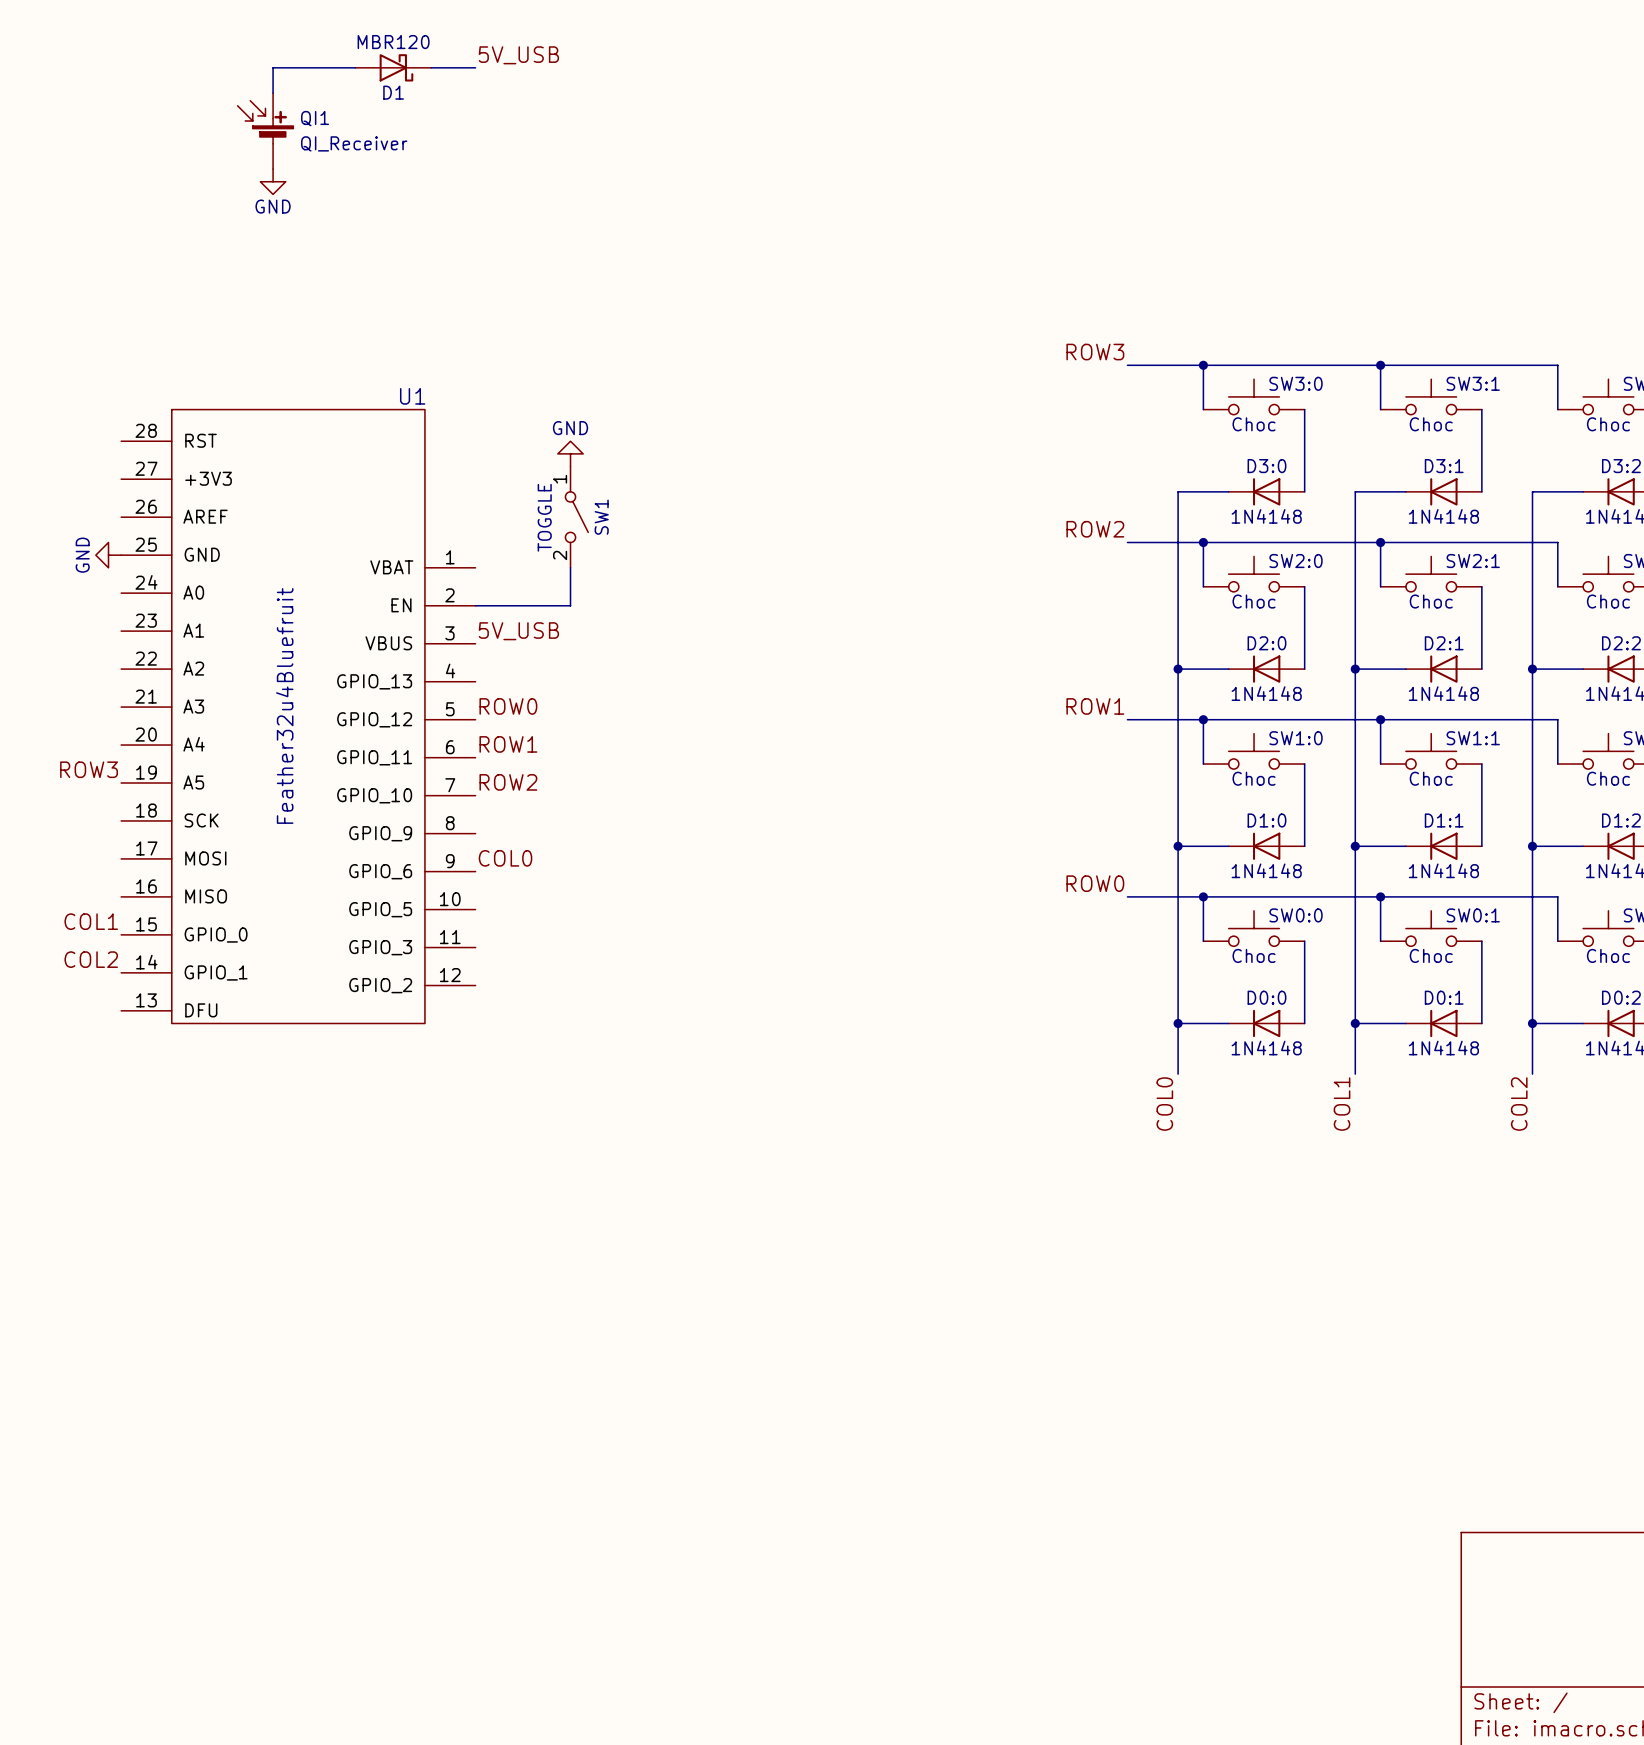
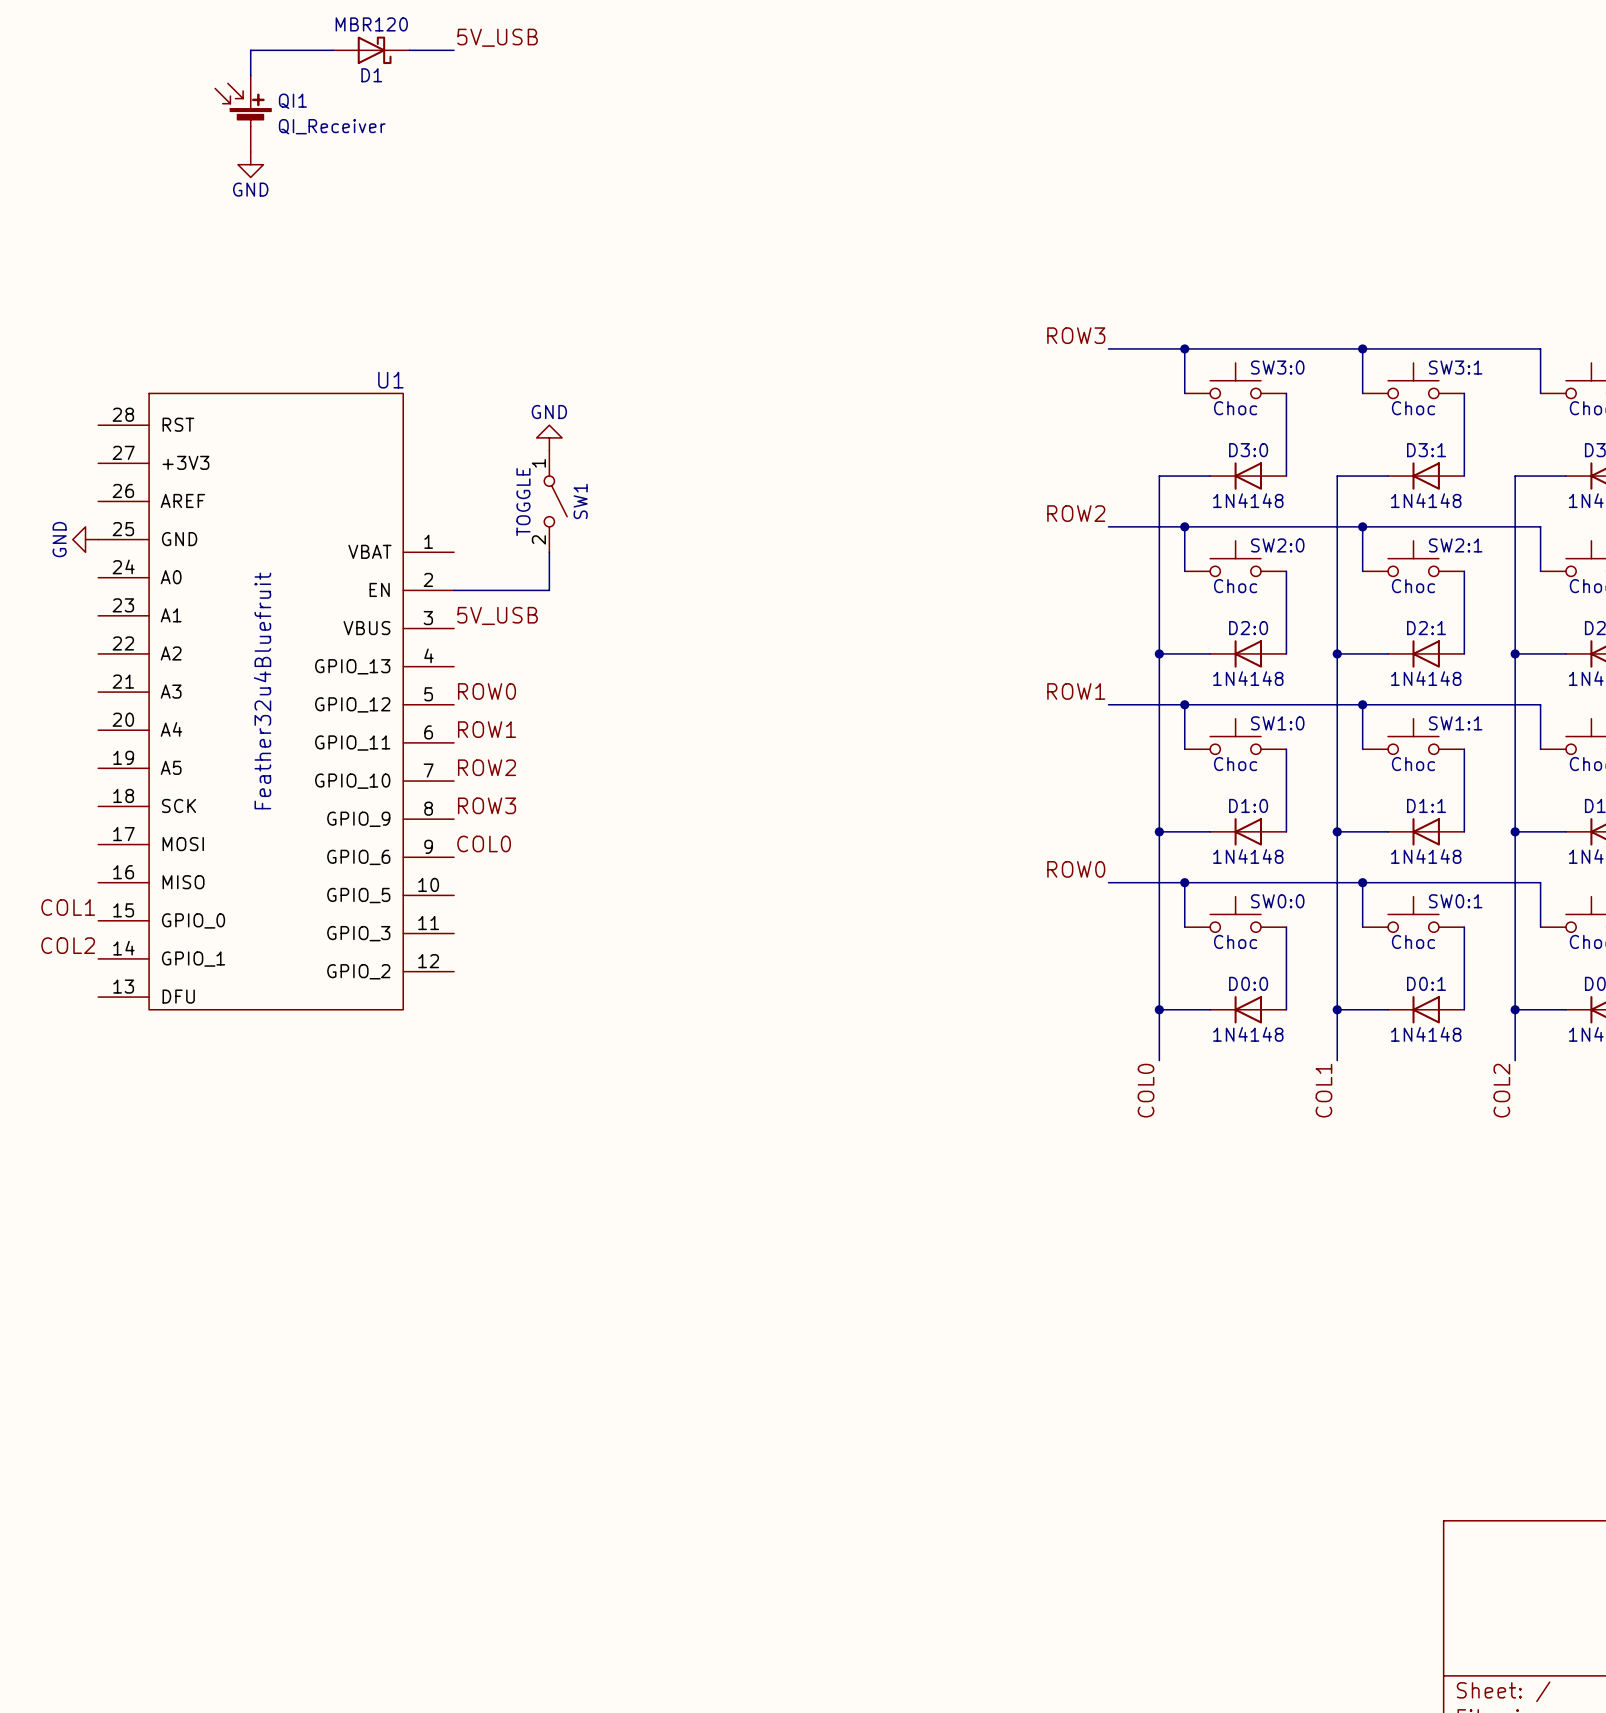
label: ROW3 (89, 769) -> none
label: none -> ROW3 (487, 805)

